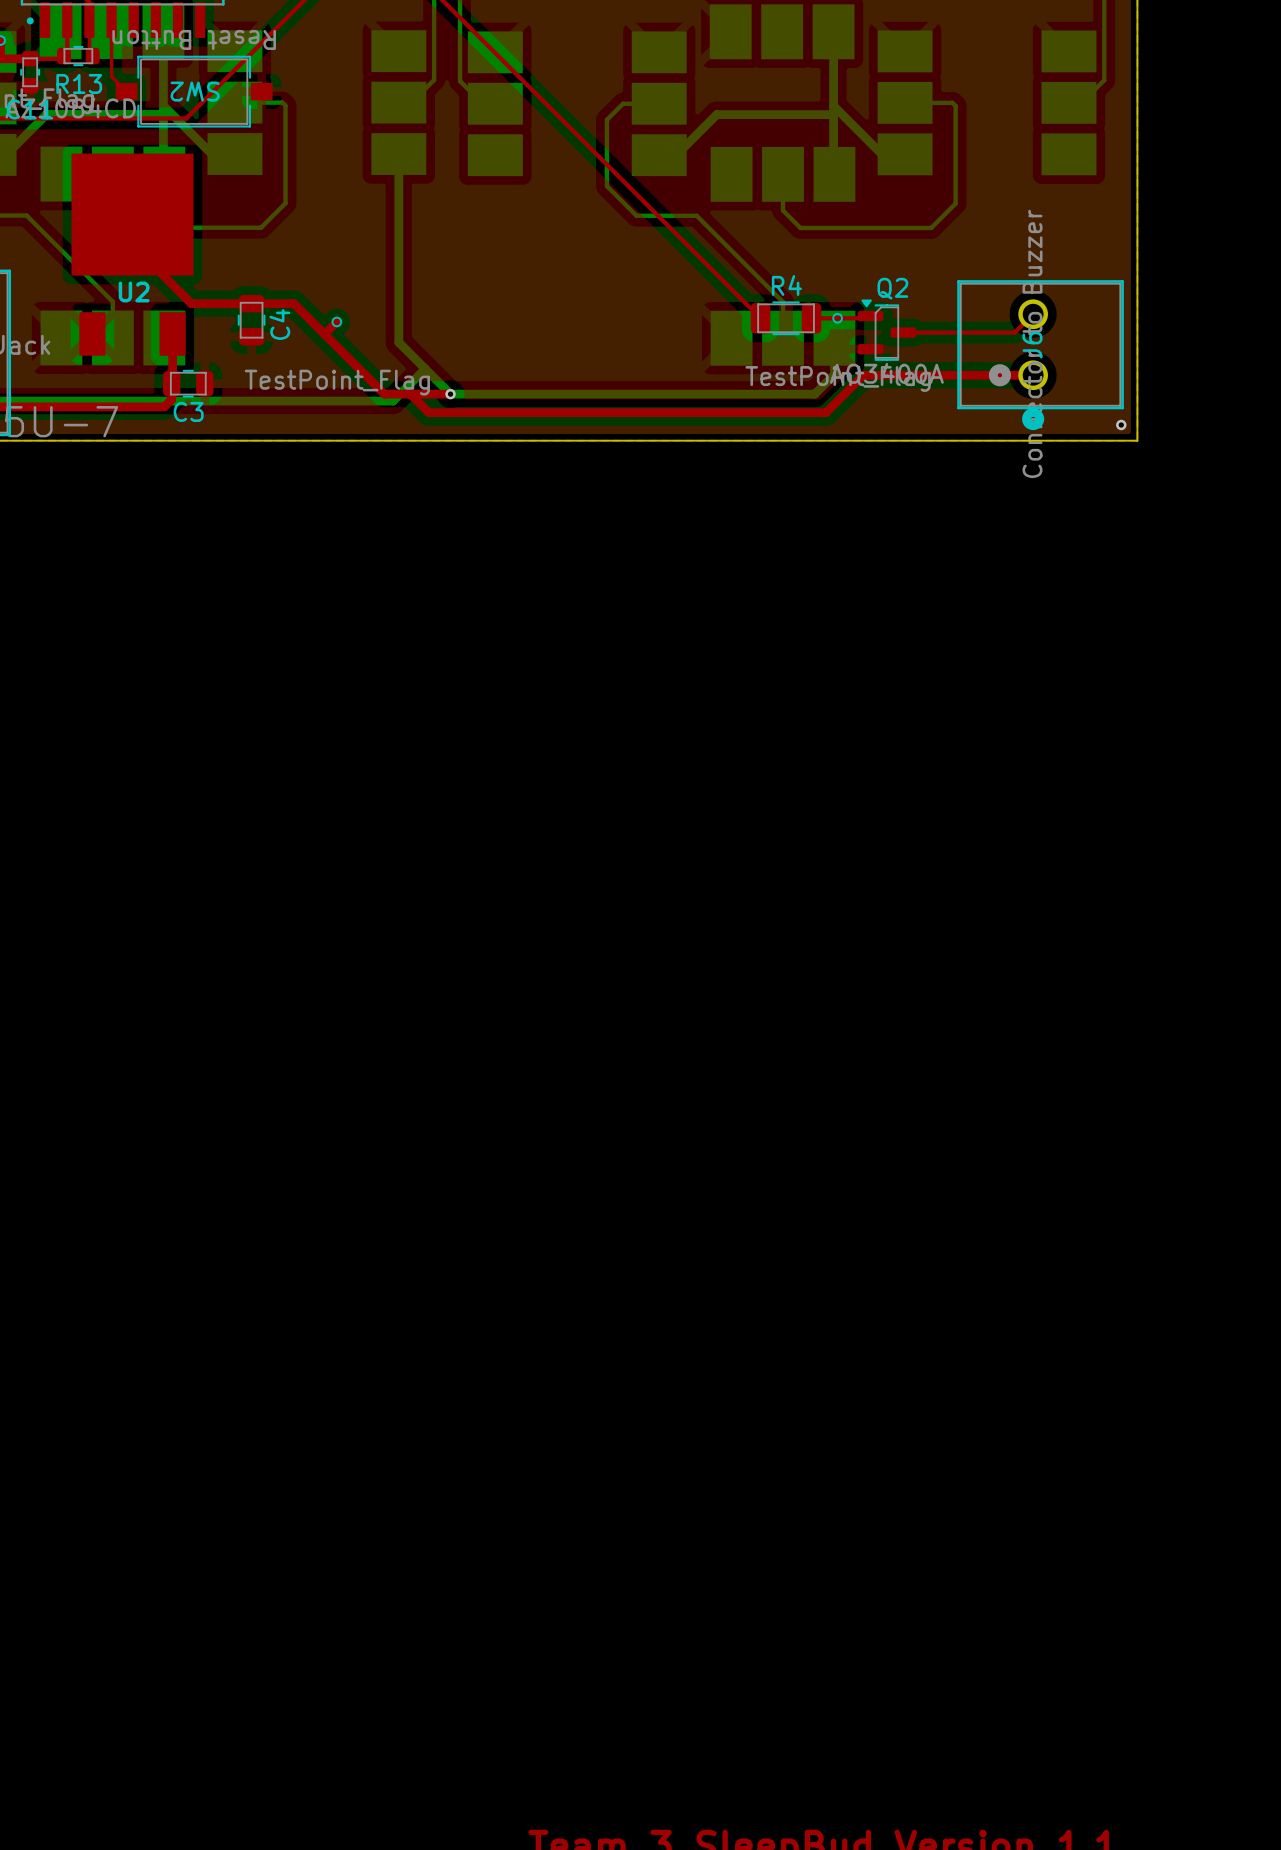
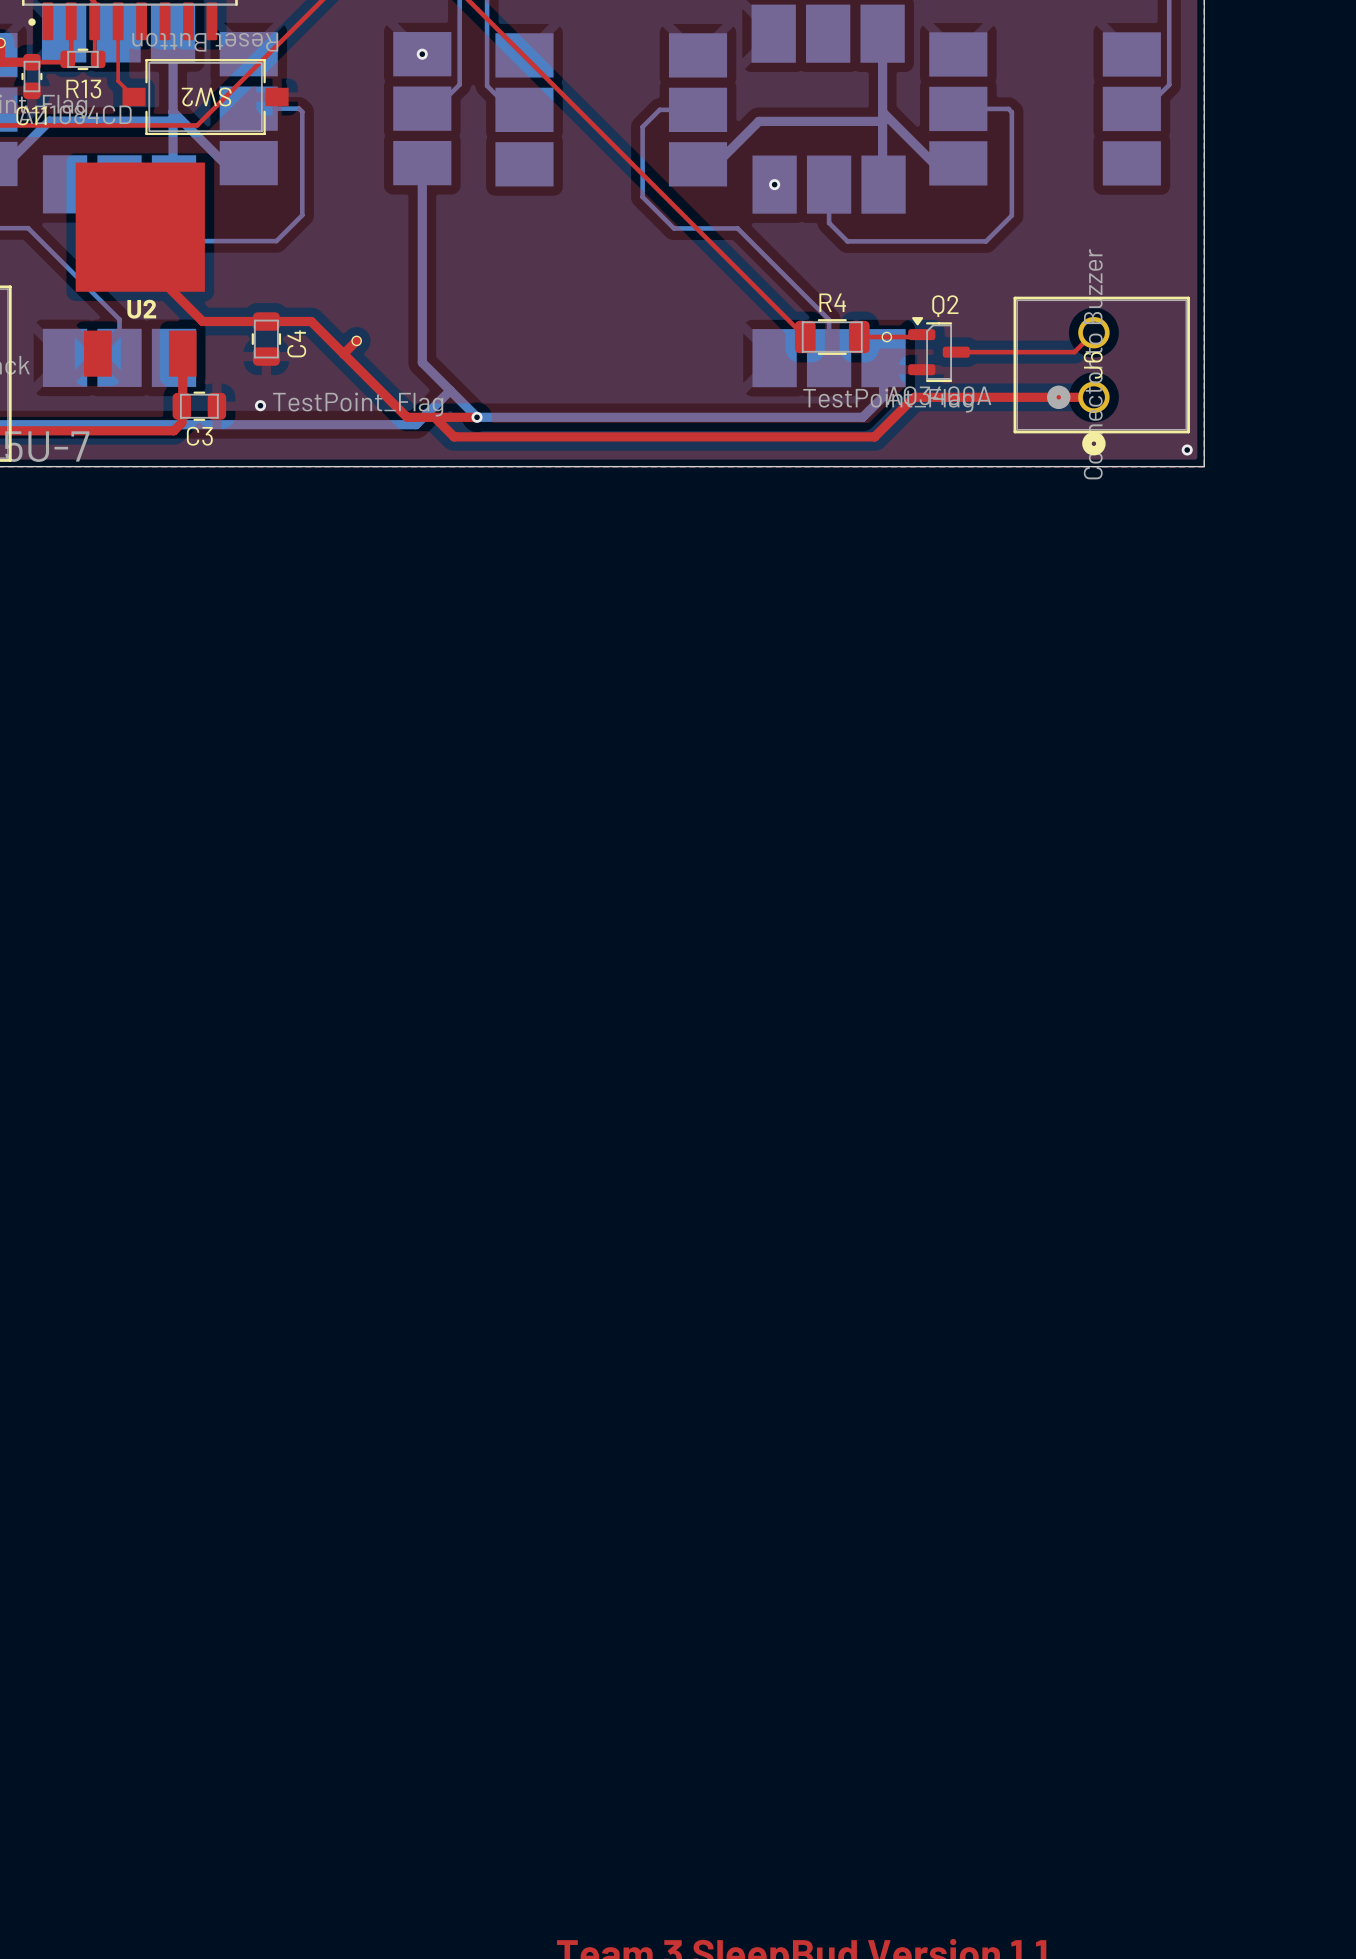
via: none -> (422, 54)
via: none -> (774, 184)
via: none -> (260, 405)

